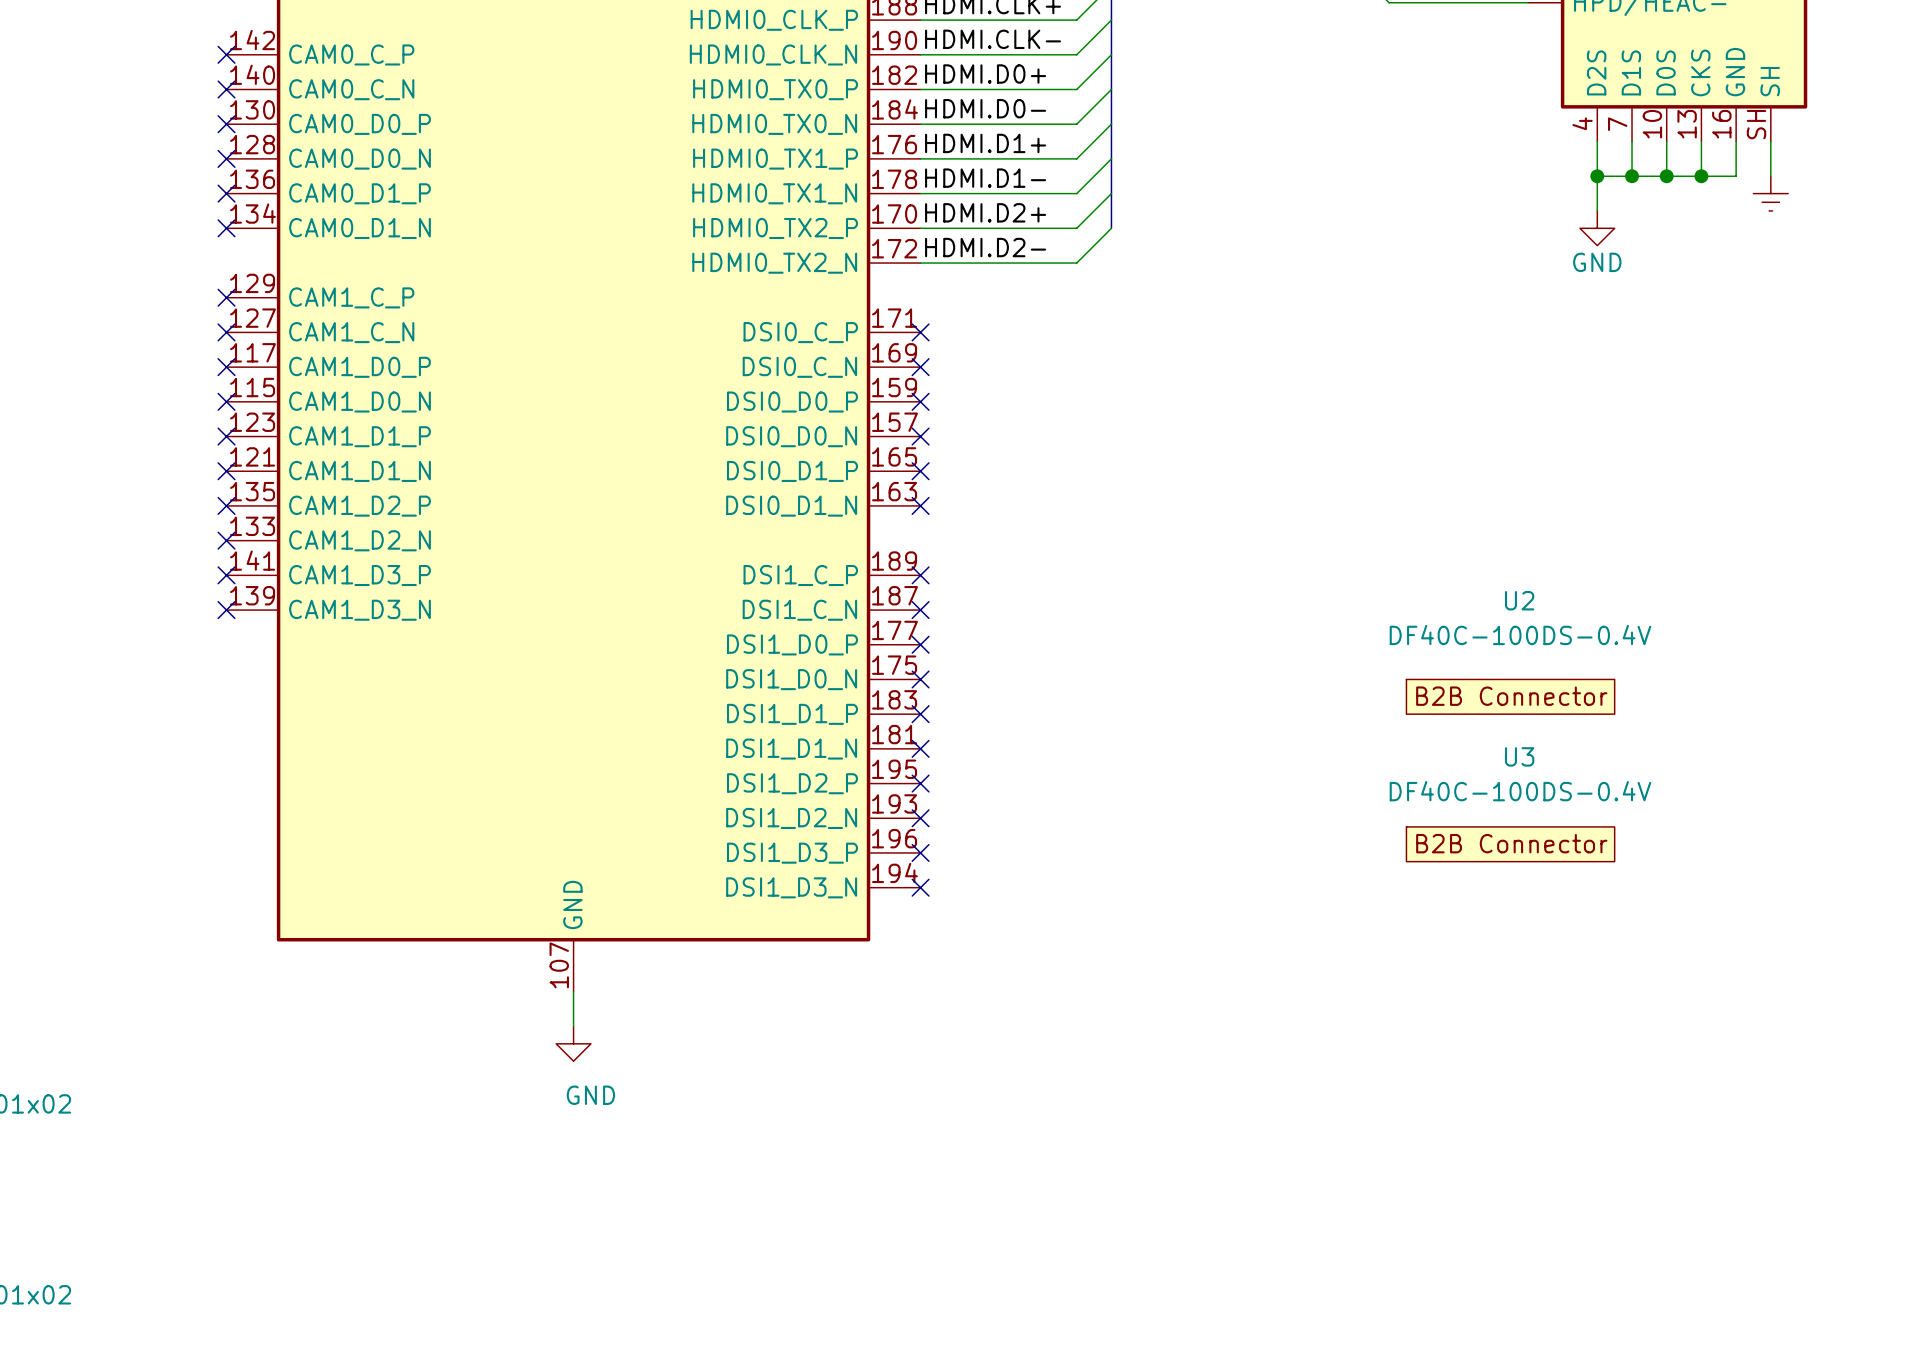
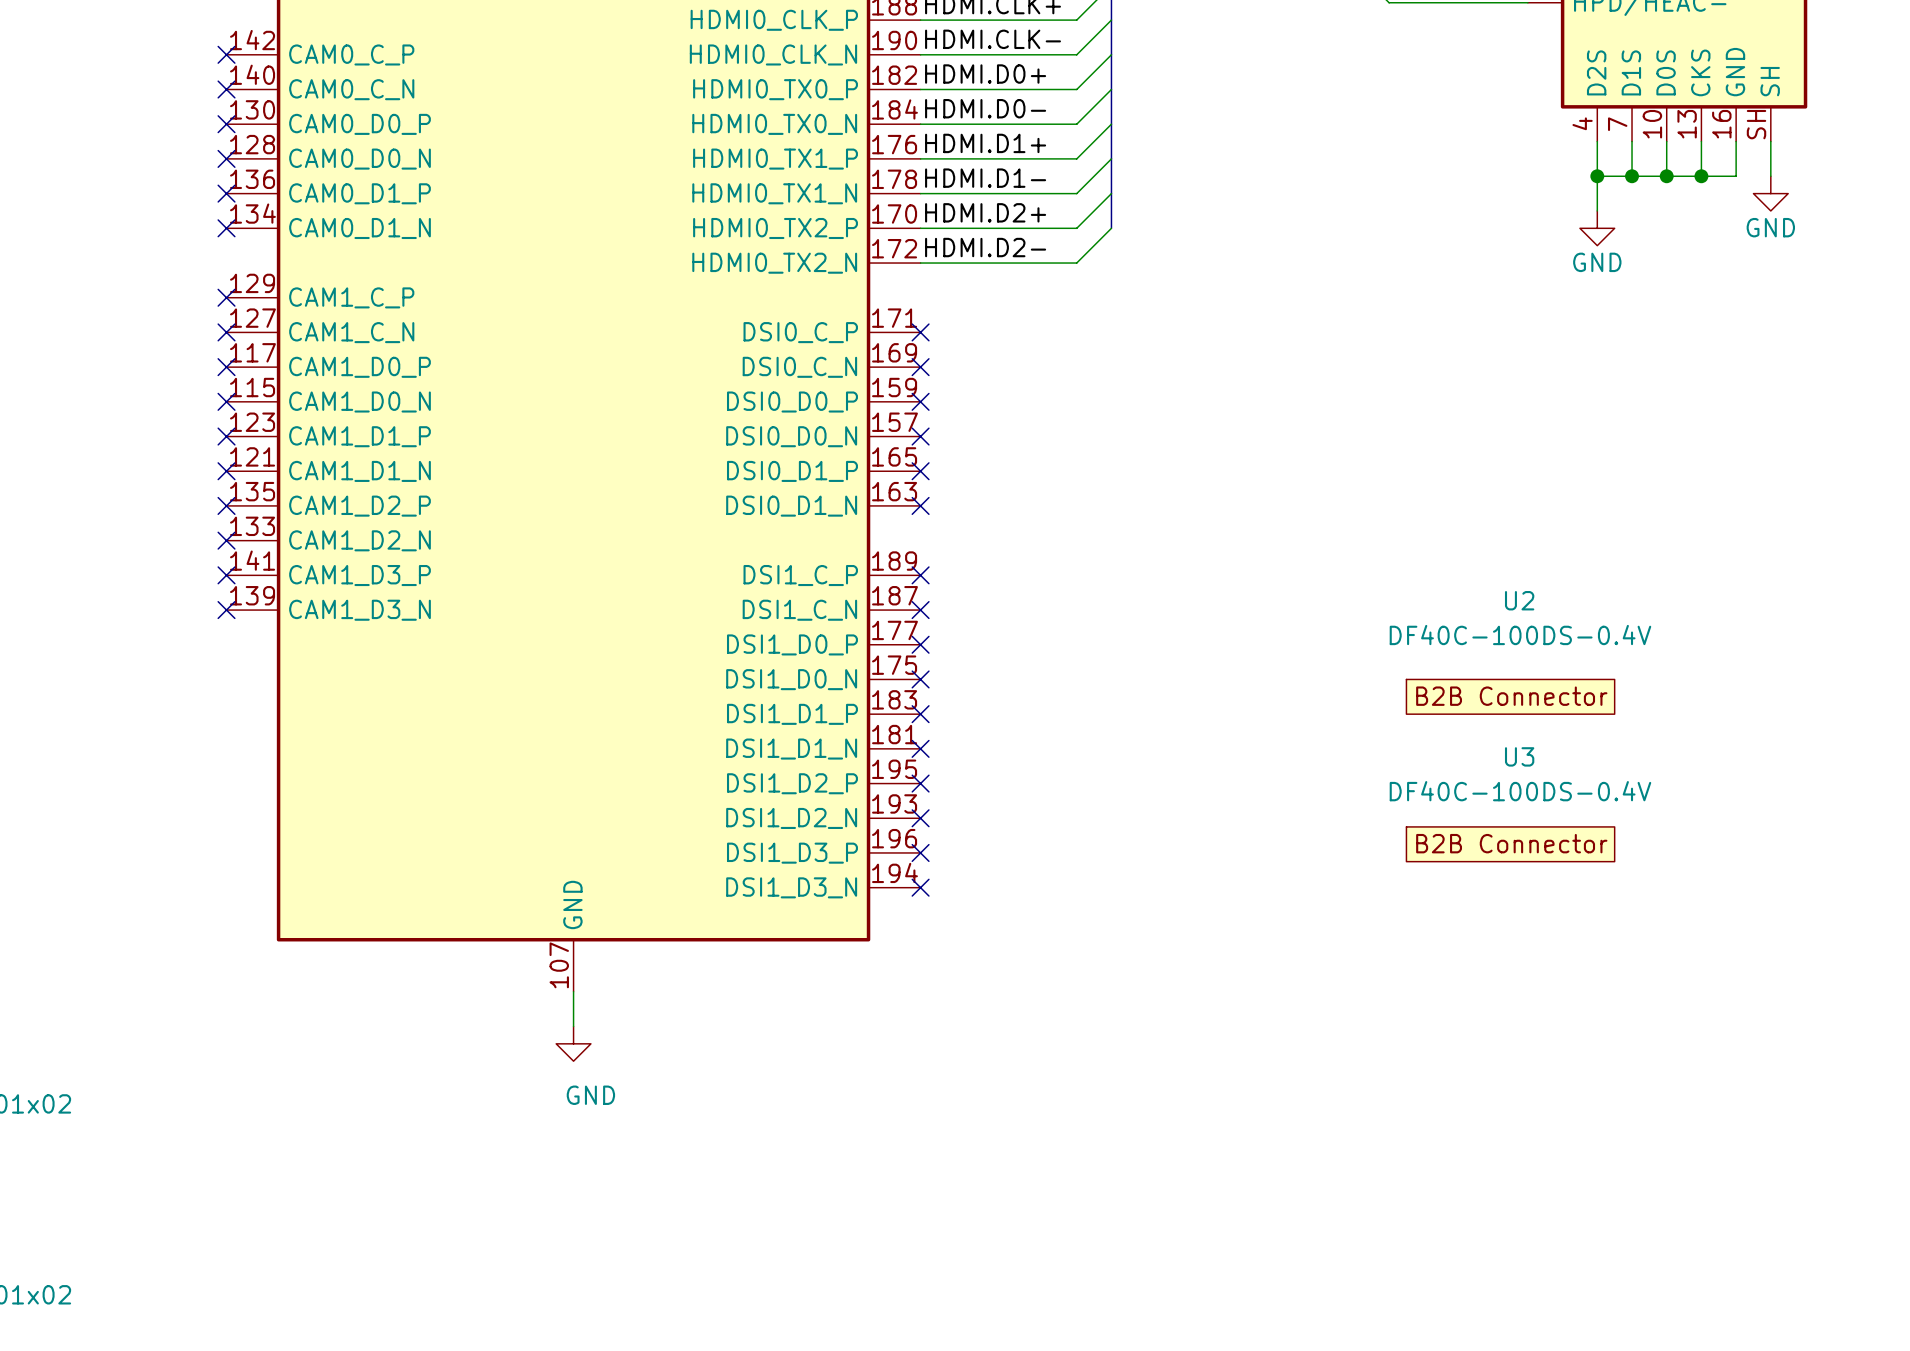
power symbol shape: [1753, 176, 1789, 211] -> [1753, 176, 1789, 211]
power symbol text: none -> GND (1770, 227)

